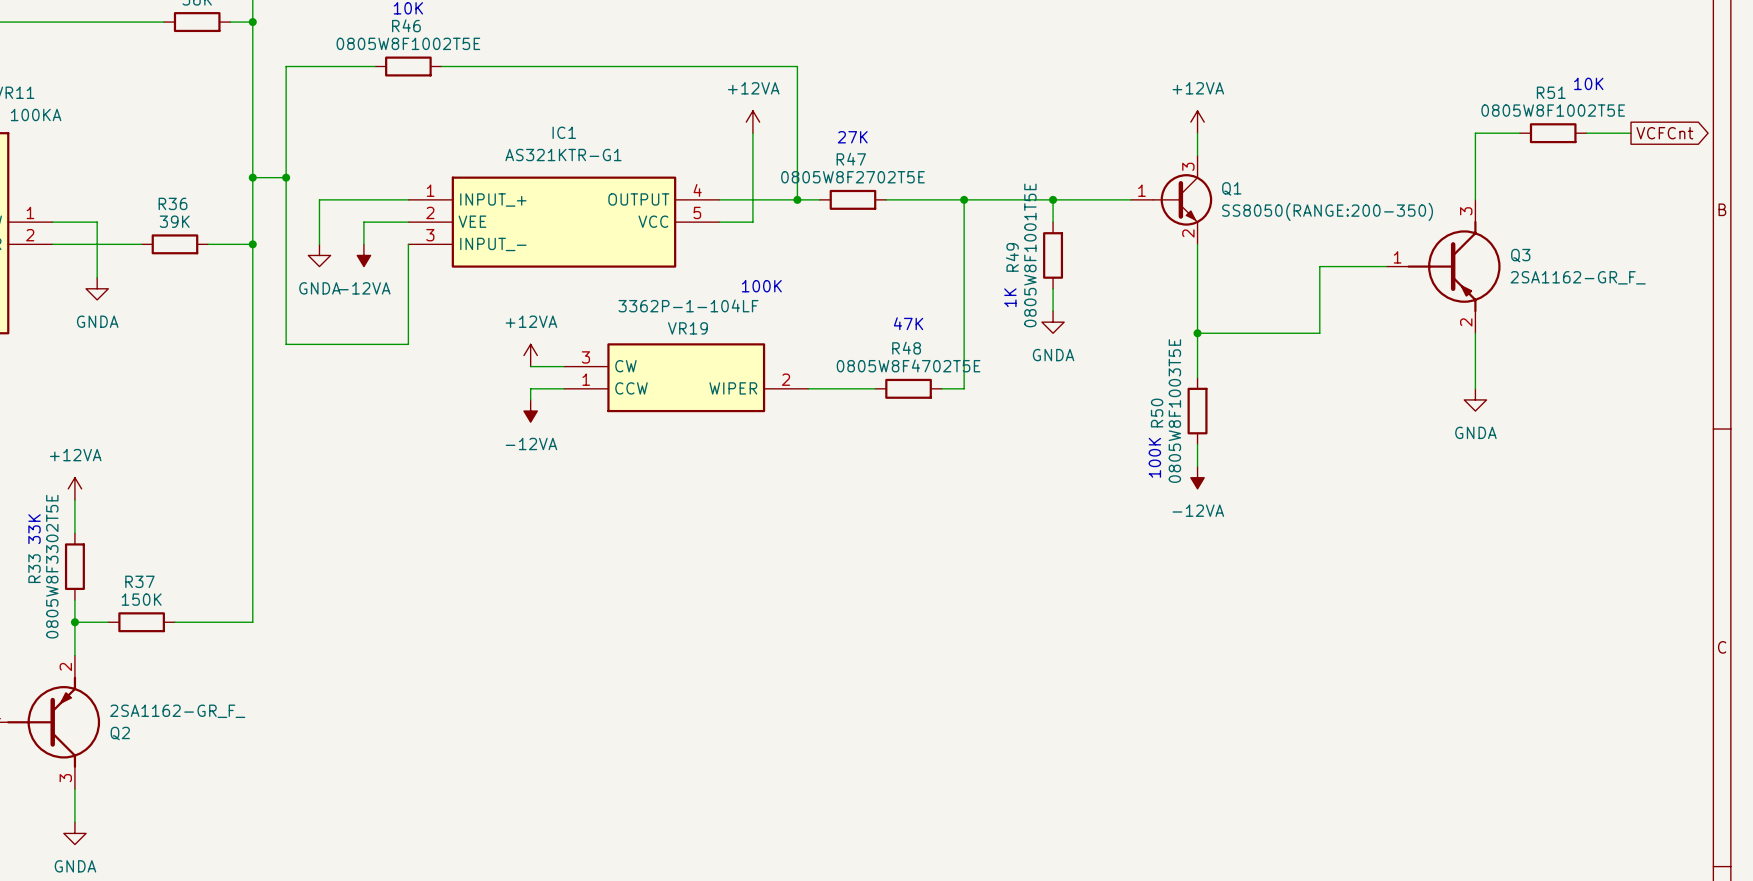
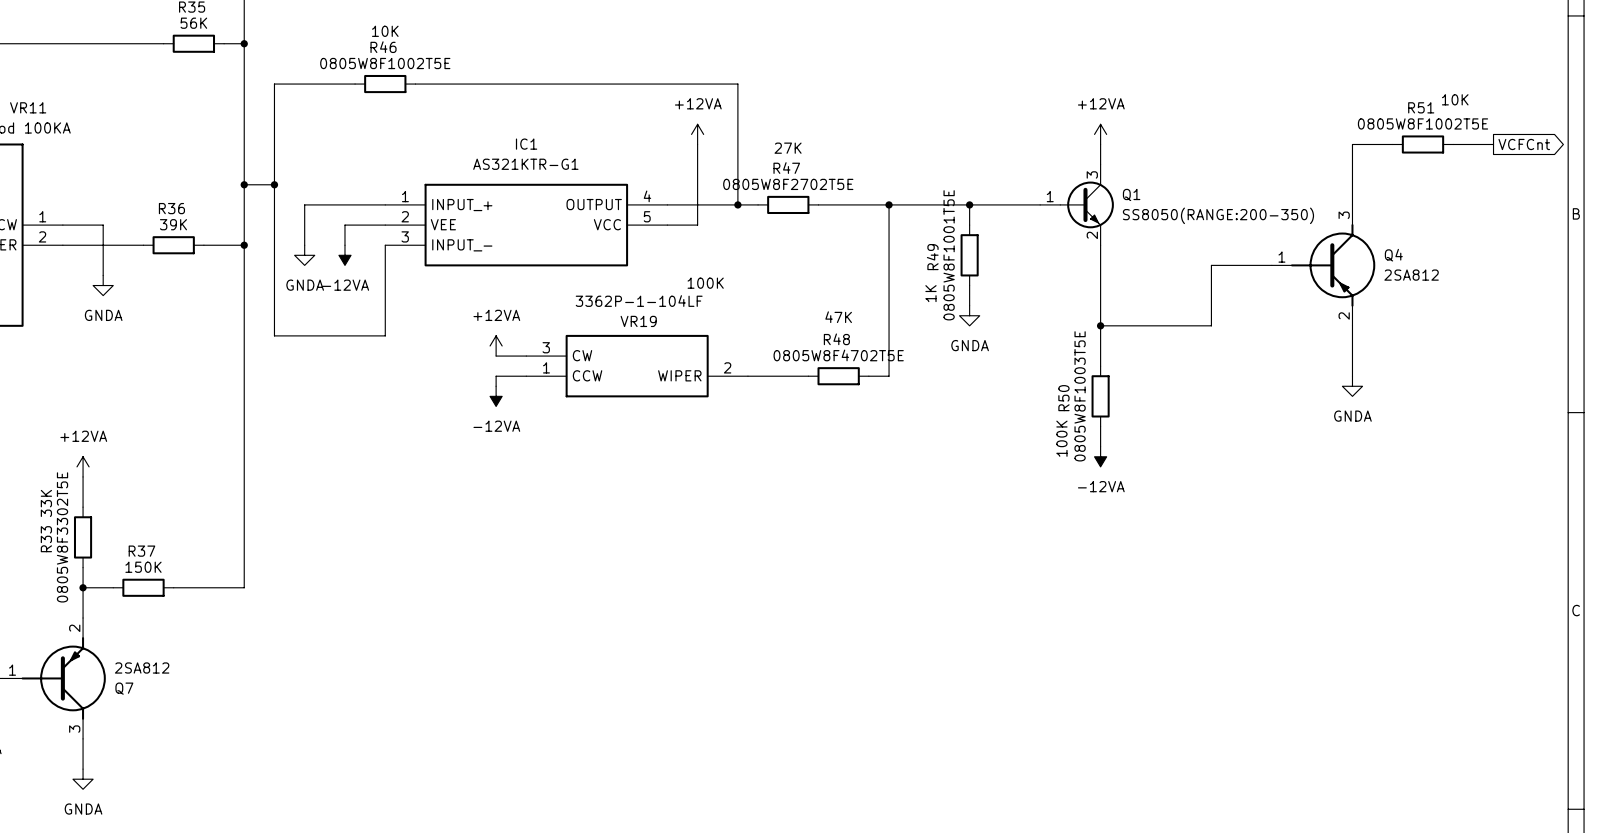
Q3 name: Q3 (1520, 255) -> Q4 (1393, 255)
Q3 value: 2SA1162-GR_F_ (1578, 277) -> 2SA812 (1411, 275)
Q2 value: 2SA1162-GR_F_ (177, 711) -> 2SA812 (142, 668)
Q2 name: Q2 (120, 733) -> Q7 (124, 688)

